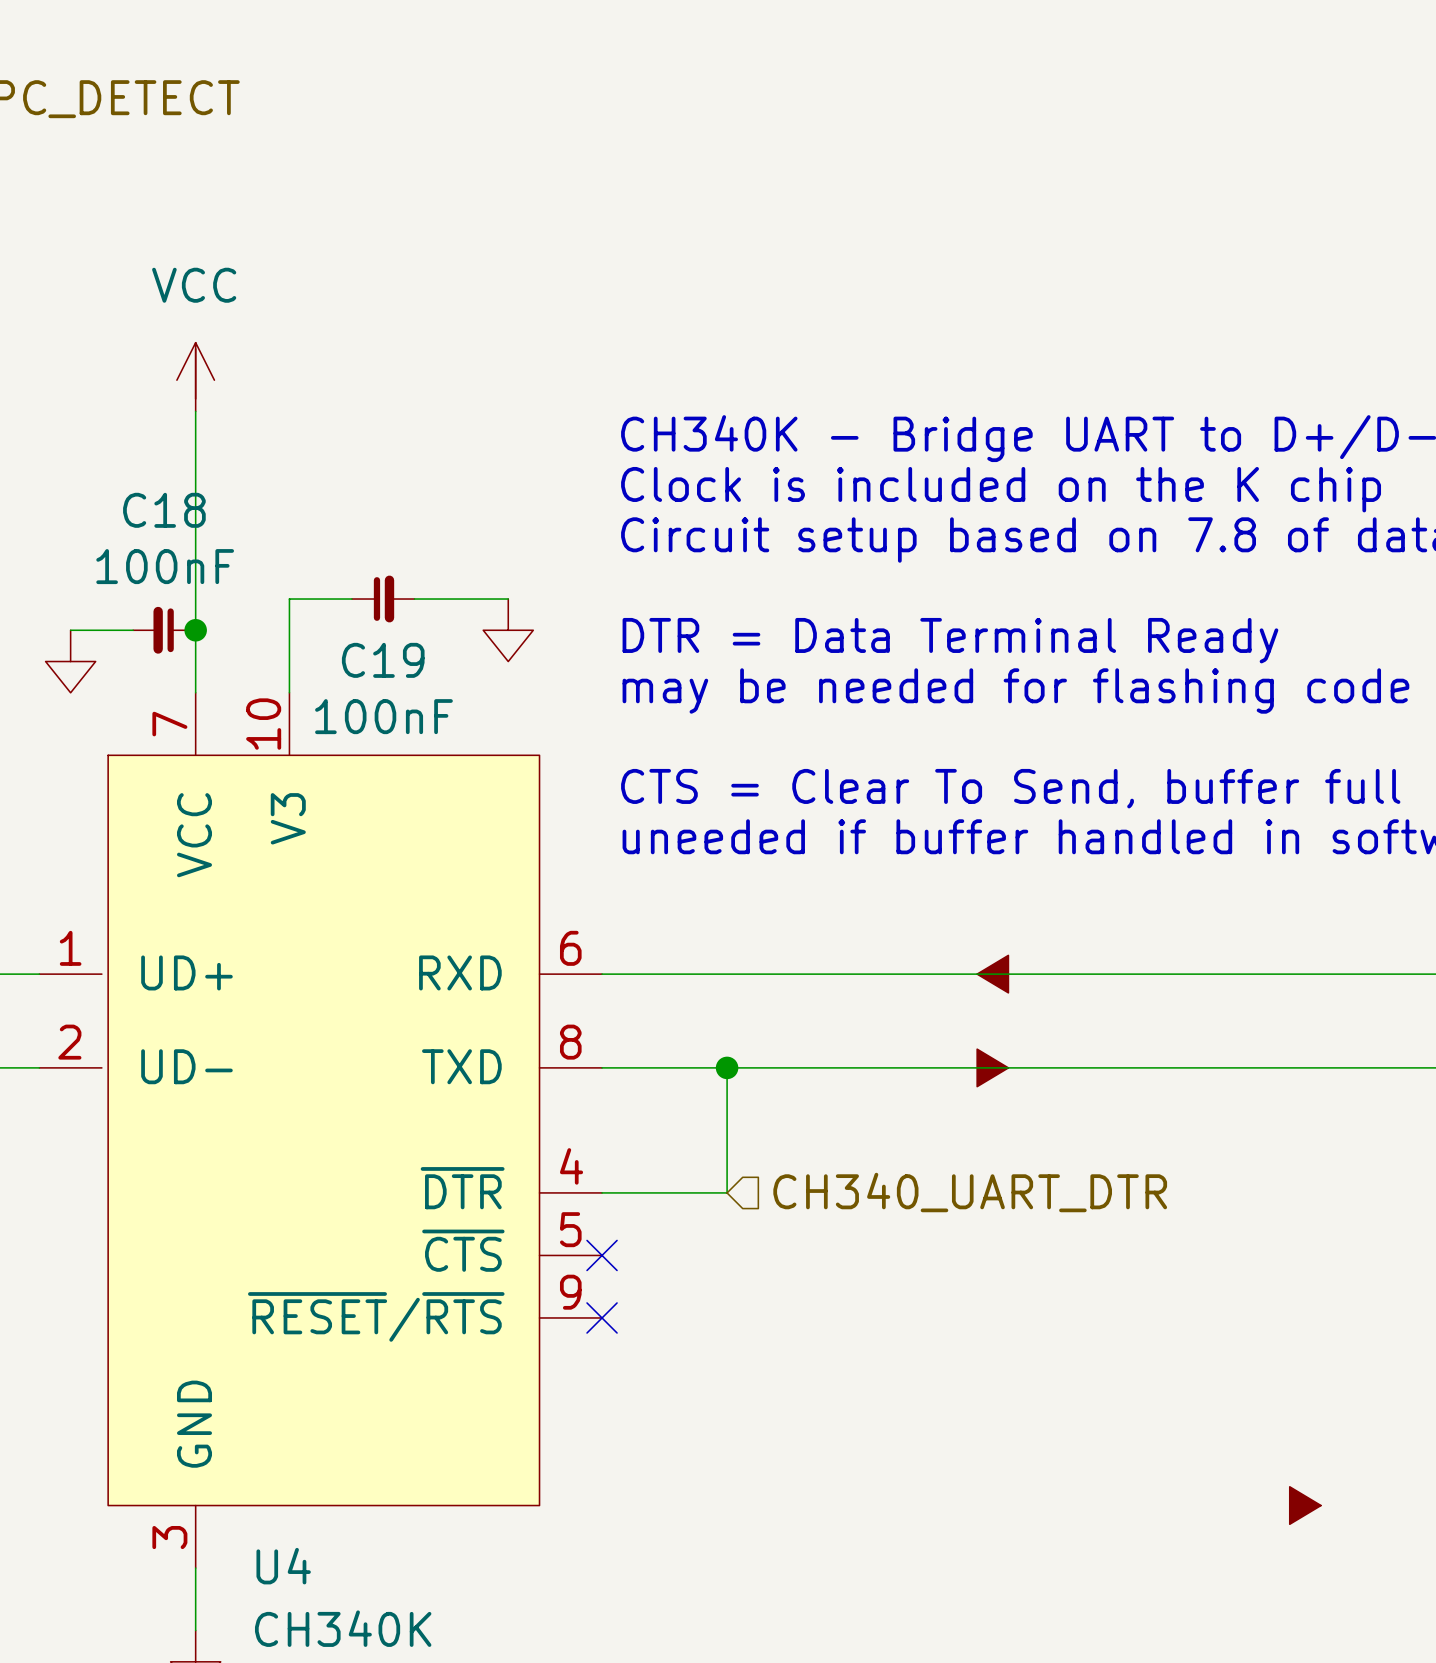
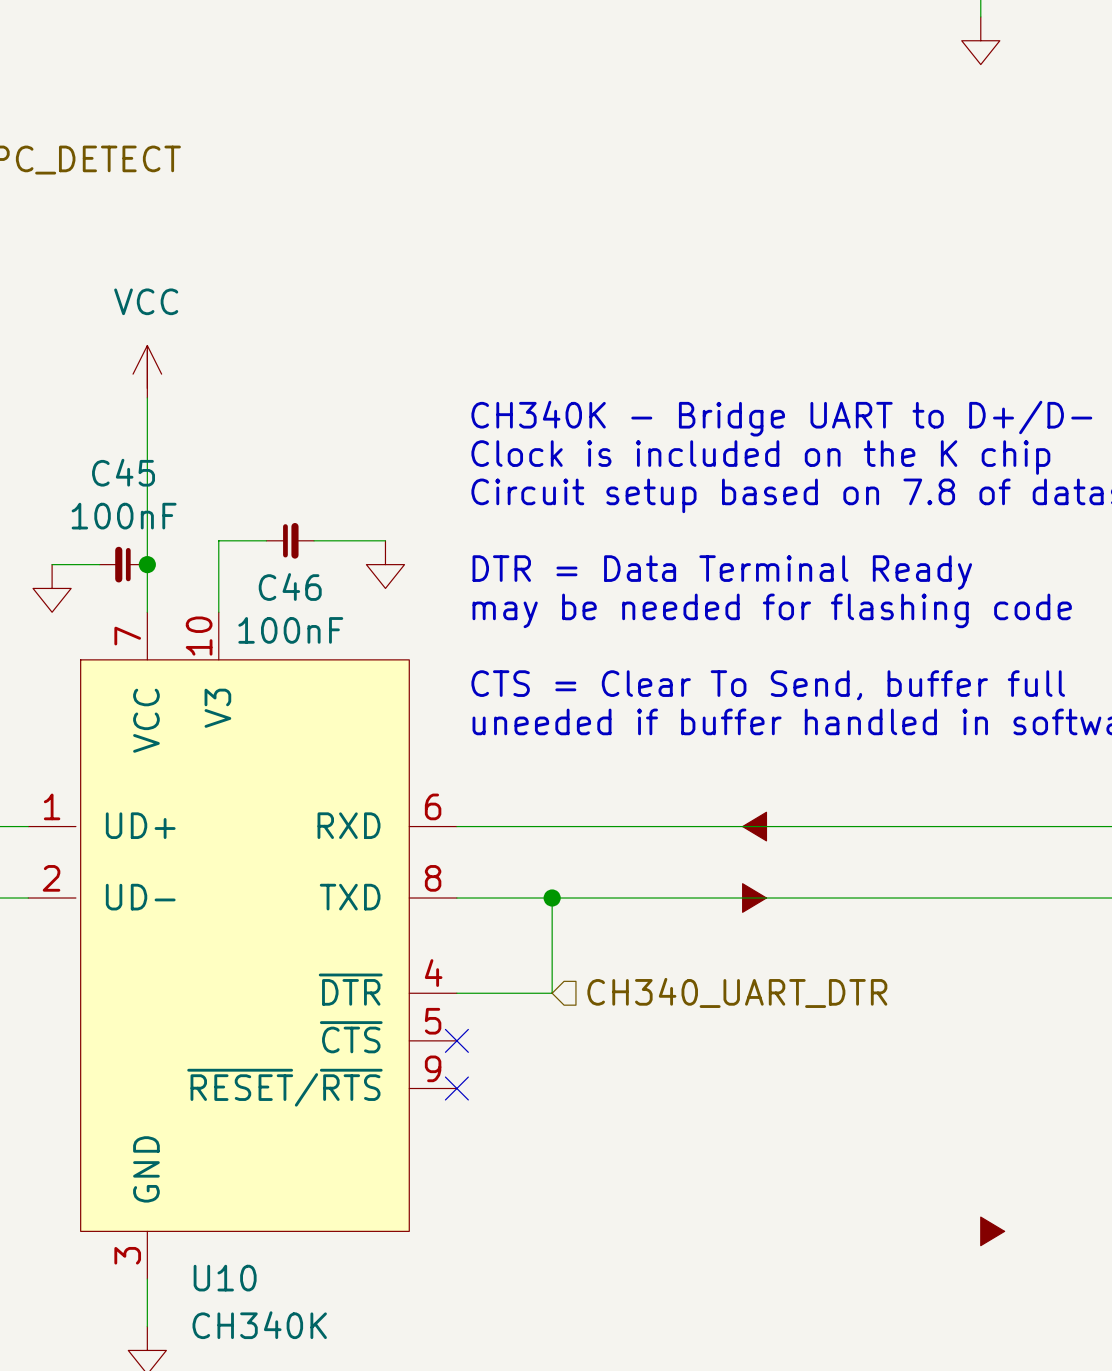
C18 name: C18 (164, 510) -> C45 (123, 472)
C19 name: C19 (383, 660) -> C46 (290, 586)
U4 name: U4 (283, 1566) -> U10 (225, 1278)

